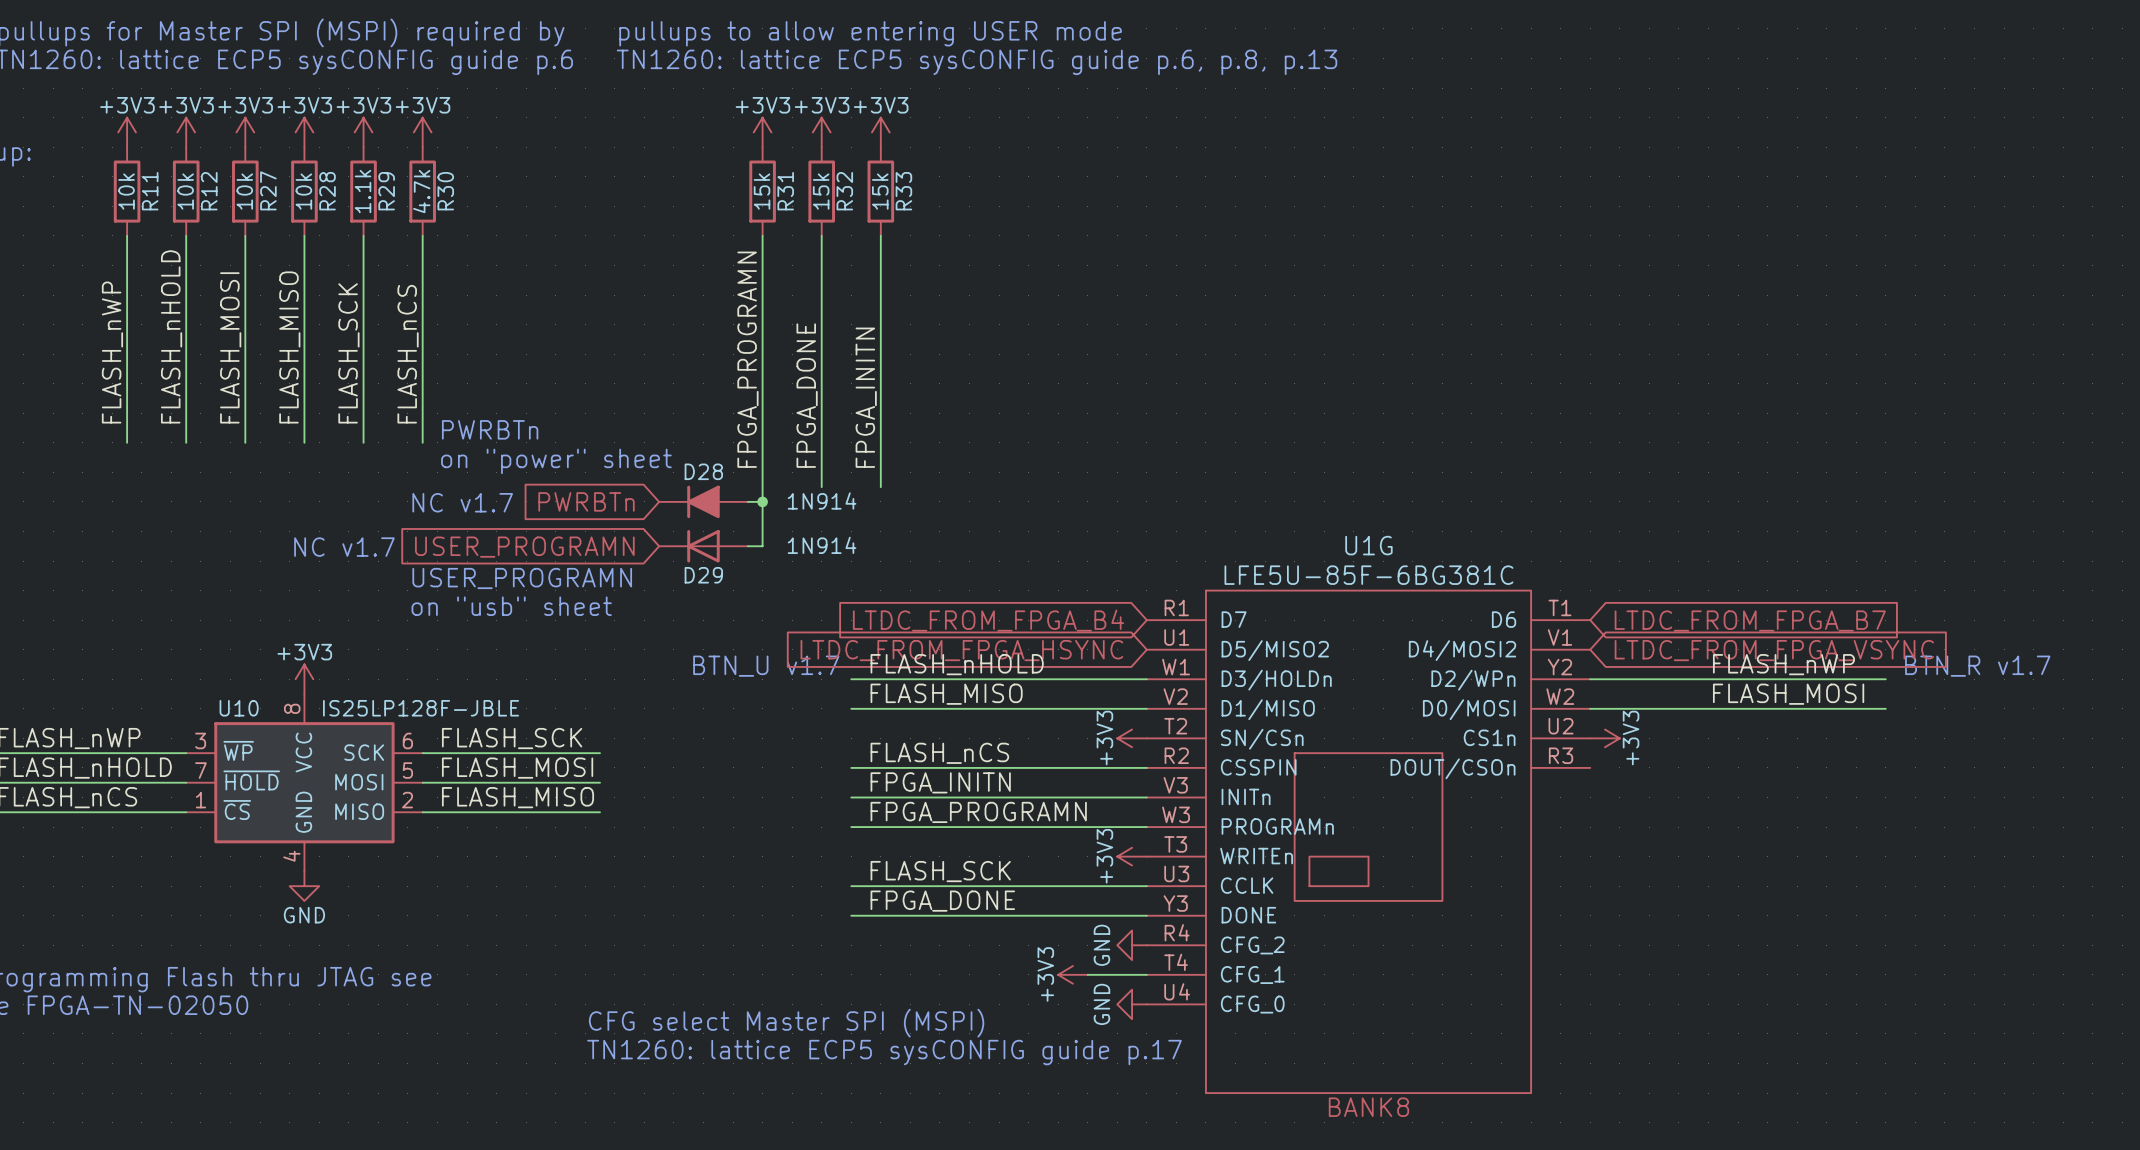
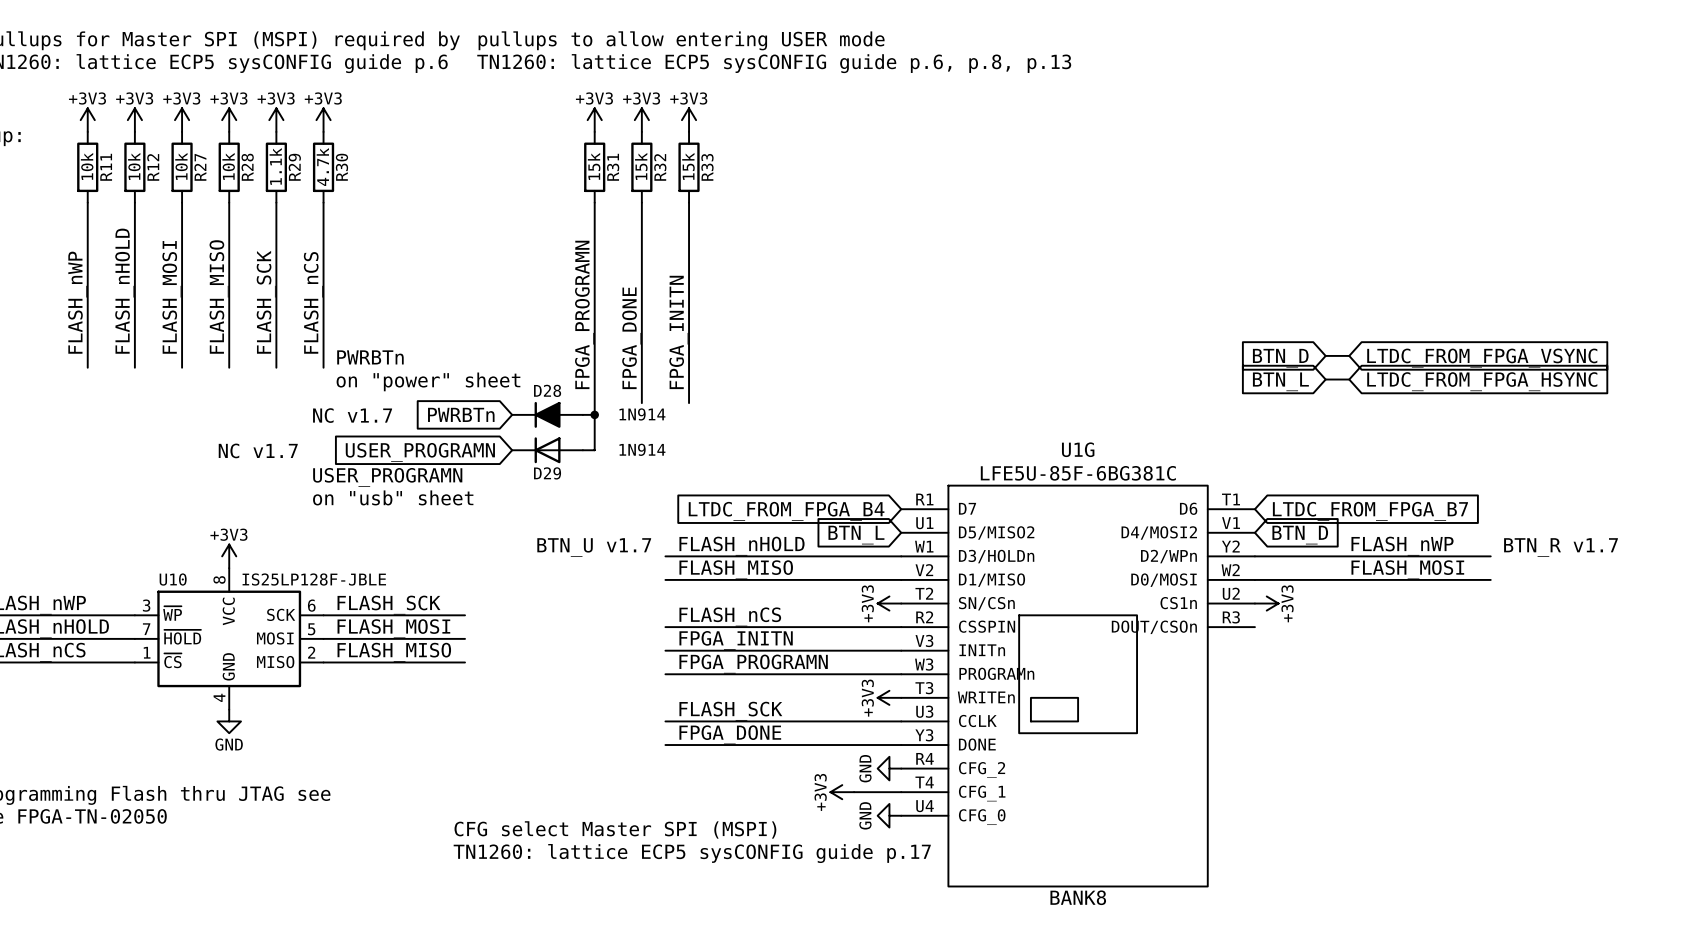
global label: none -> BTN_D (1280, 358)
wire: none -> (1325, 355) (1349, 355)
global label: none -> LTDC_FROM_FPGA_VSYNC (1482, 358)
wire: none -> (1325, 379) (1349, 379)
global label: none -> BTN_L (1280, 381)
global label: none -> LTDC_FROM_FPGA_HSYNC (1482, 381)
global label: LTDC_FROM_FPGA_HSYNC (961, 650) -> BTN_L (856, 535)
global label: LTDC_FROM_FPGA_VSYNC (1774, 650) -> BTN_D (1300, 535)

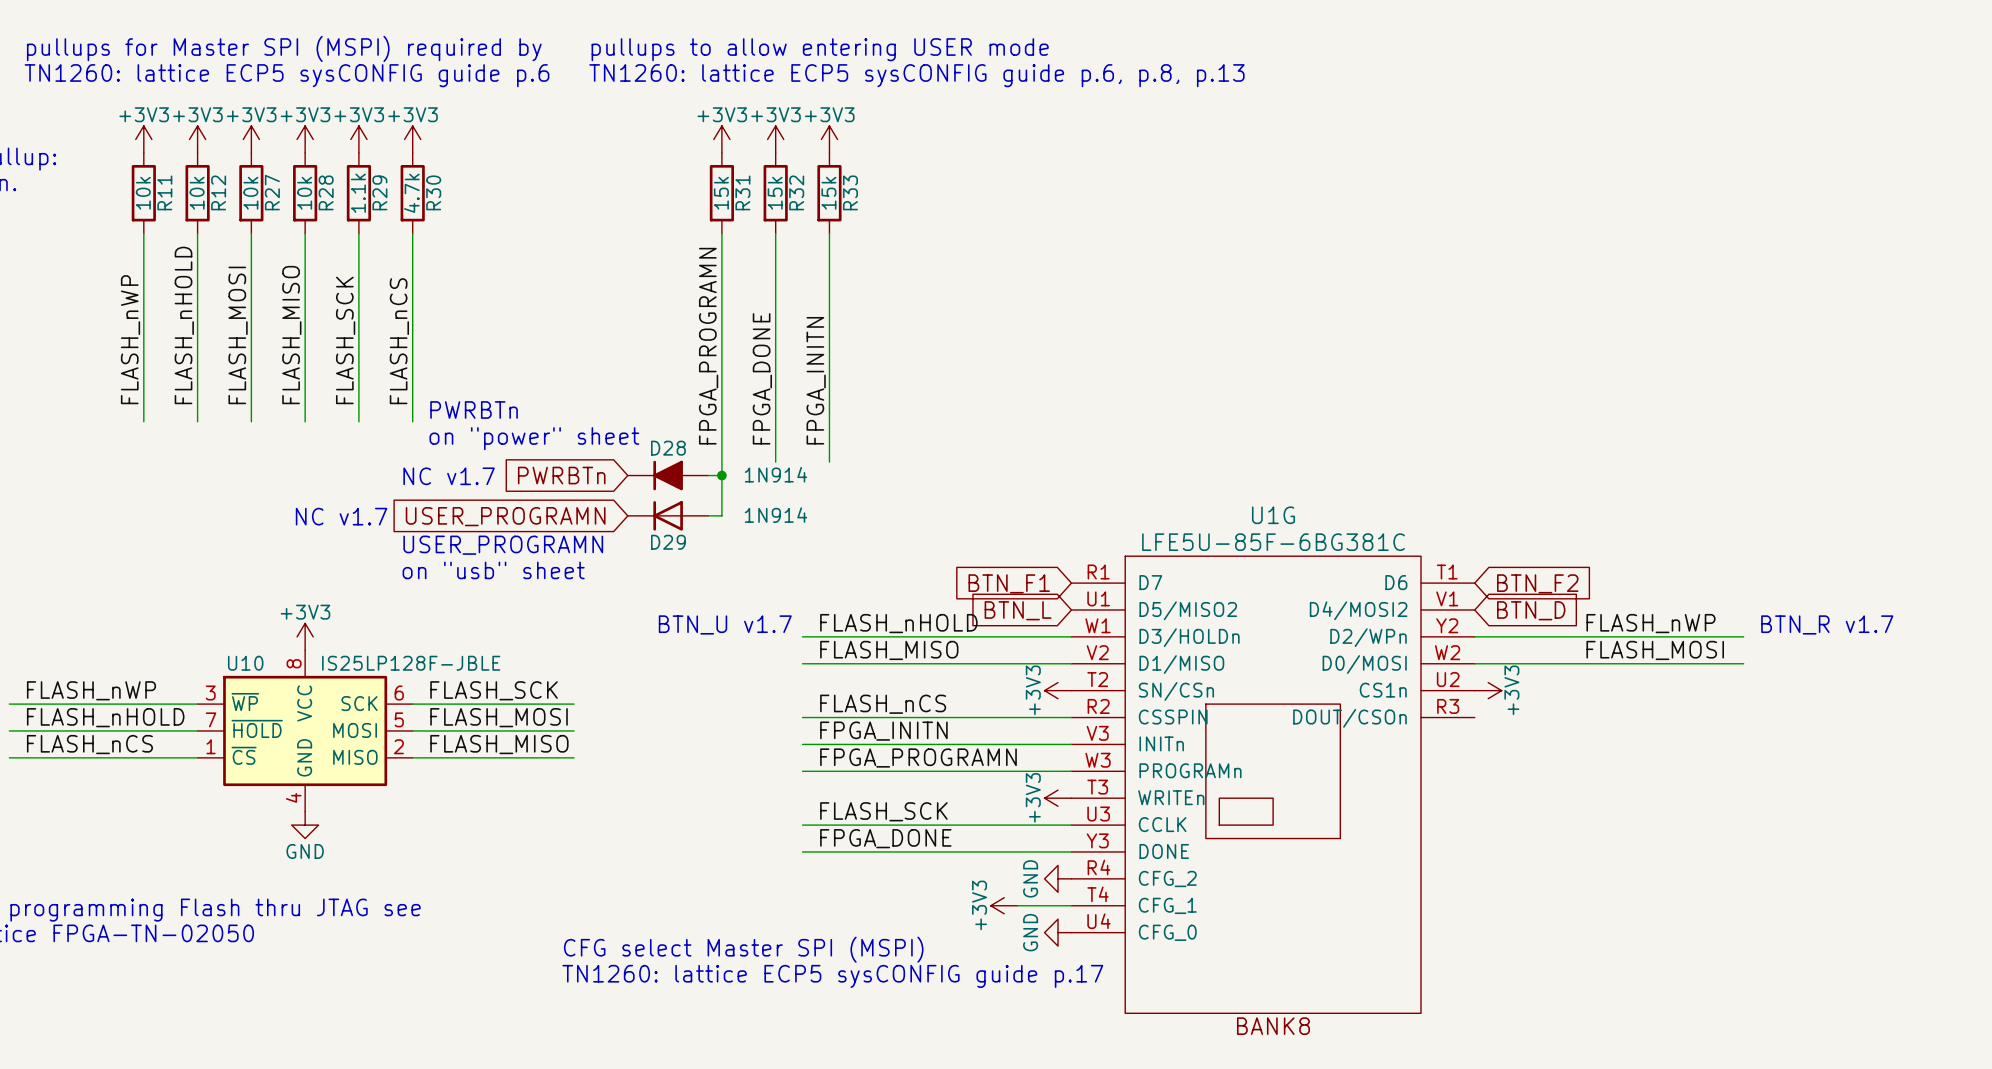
wire: (1325, 355) (1349, 355) -> none
global label: BTN_D (1280, 358) -> none
global label: LTDC_FROM_FPGA_VSYNC (1482, 358) -> none
wire: (1325, 379) (1349, 379) -> none
global label: BTN_L (1280, 381) -> none
global label: LTDC_FROM_FPGA_HSYNC (1482, 381) -> none
global label: LTDC_FROM_FPGA_B4 (786, 511) -> BTN_F1 (1009, 583)
global label: LTDC_FROM_FPGA_B7 (1370, 511) -> BTN_F2 (1537, 583)

